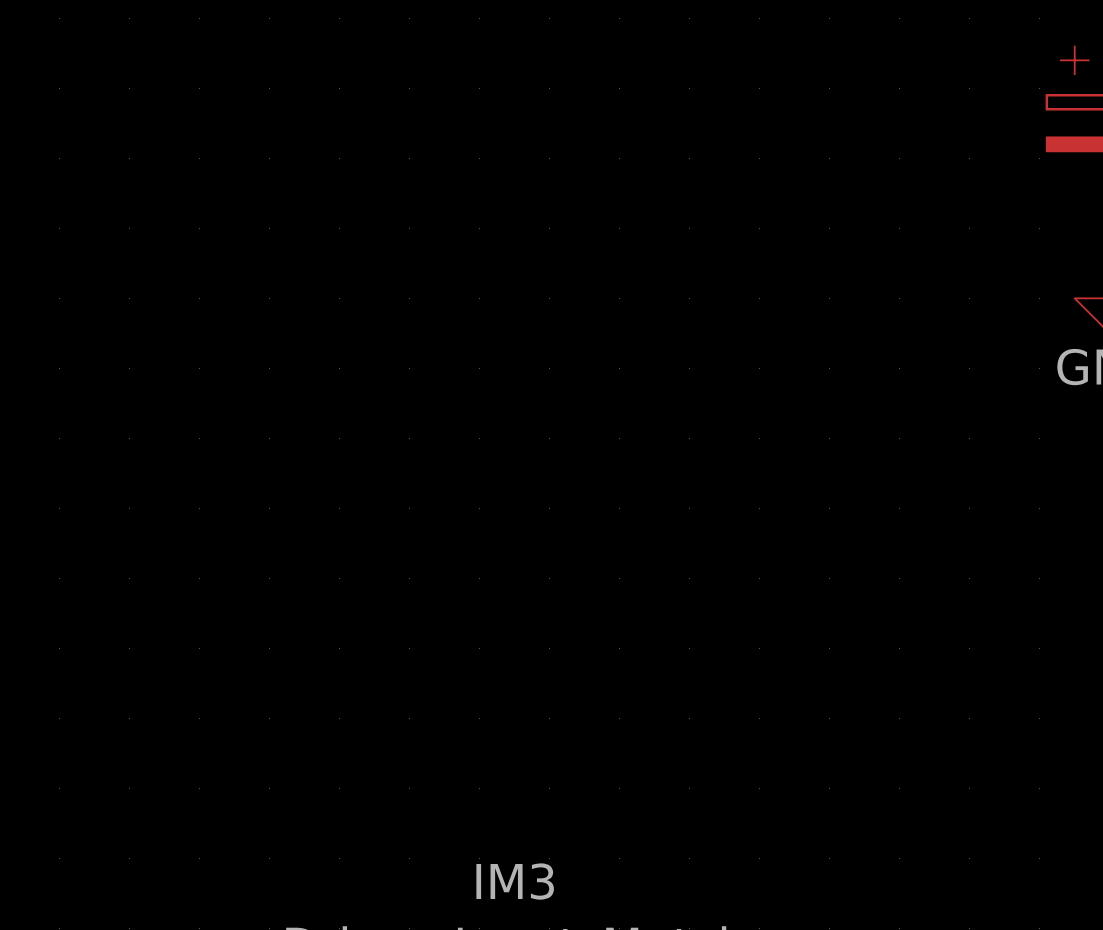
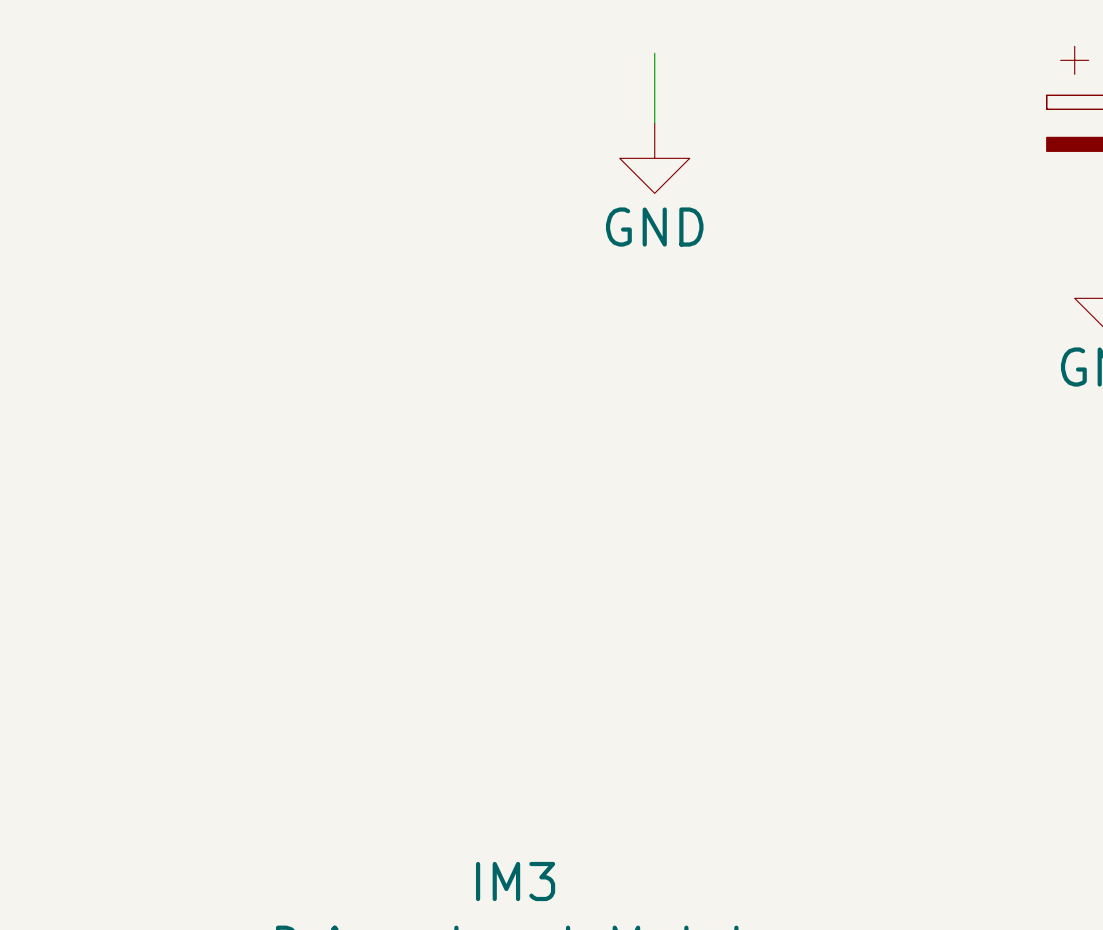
wire: none -> (654, 53) (654, 123)
power symbol: none -> GND (654, 158)

